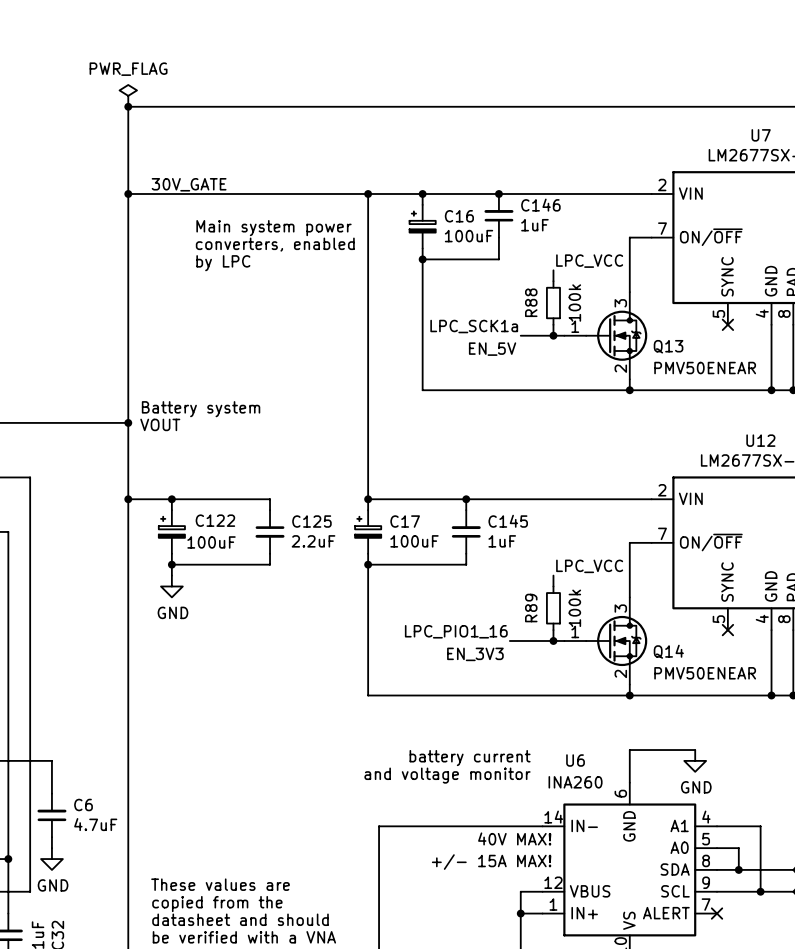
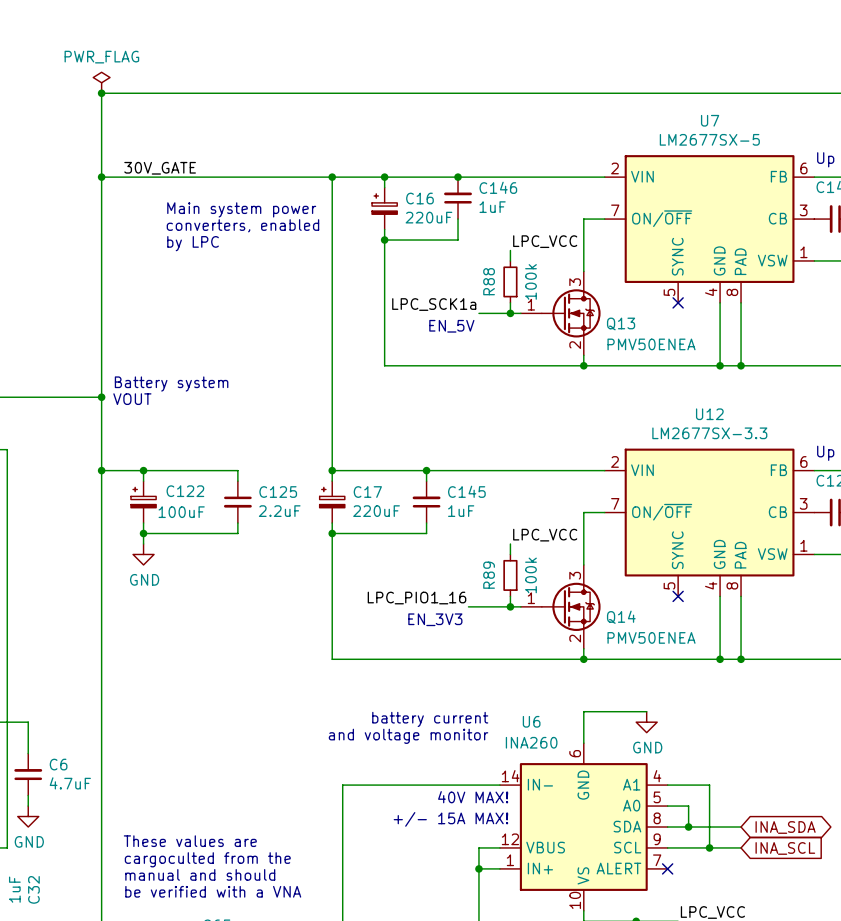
C16 value: 100uF (469, 236) -> 220uF (428, 217)
Q13 value: PMV50ENEAR (705, 368) -> PMV50ENEA (651, 344)
C17 value: 100uF (414, 541) -> 220uF (376, 511)
Q14 value: PMV50ENEAR (705, 673) -> PMV50ENEA (651, 637)
text: copied from the (217, 904) -> cargoculted from the (207, 859)
text: datasheet and should (240, 919) -> manual and should (200, 874)

